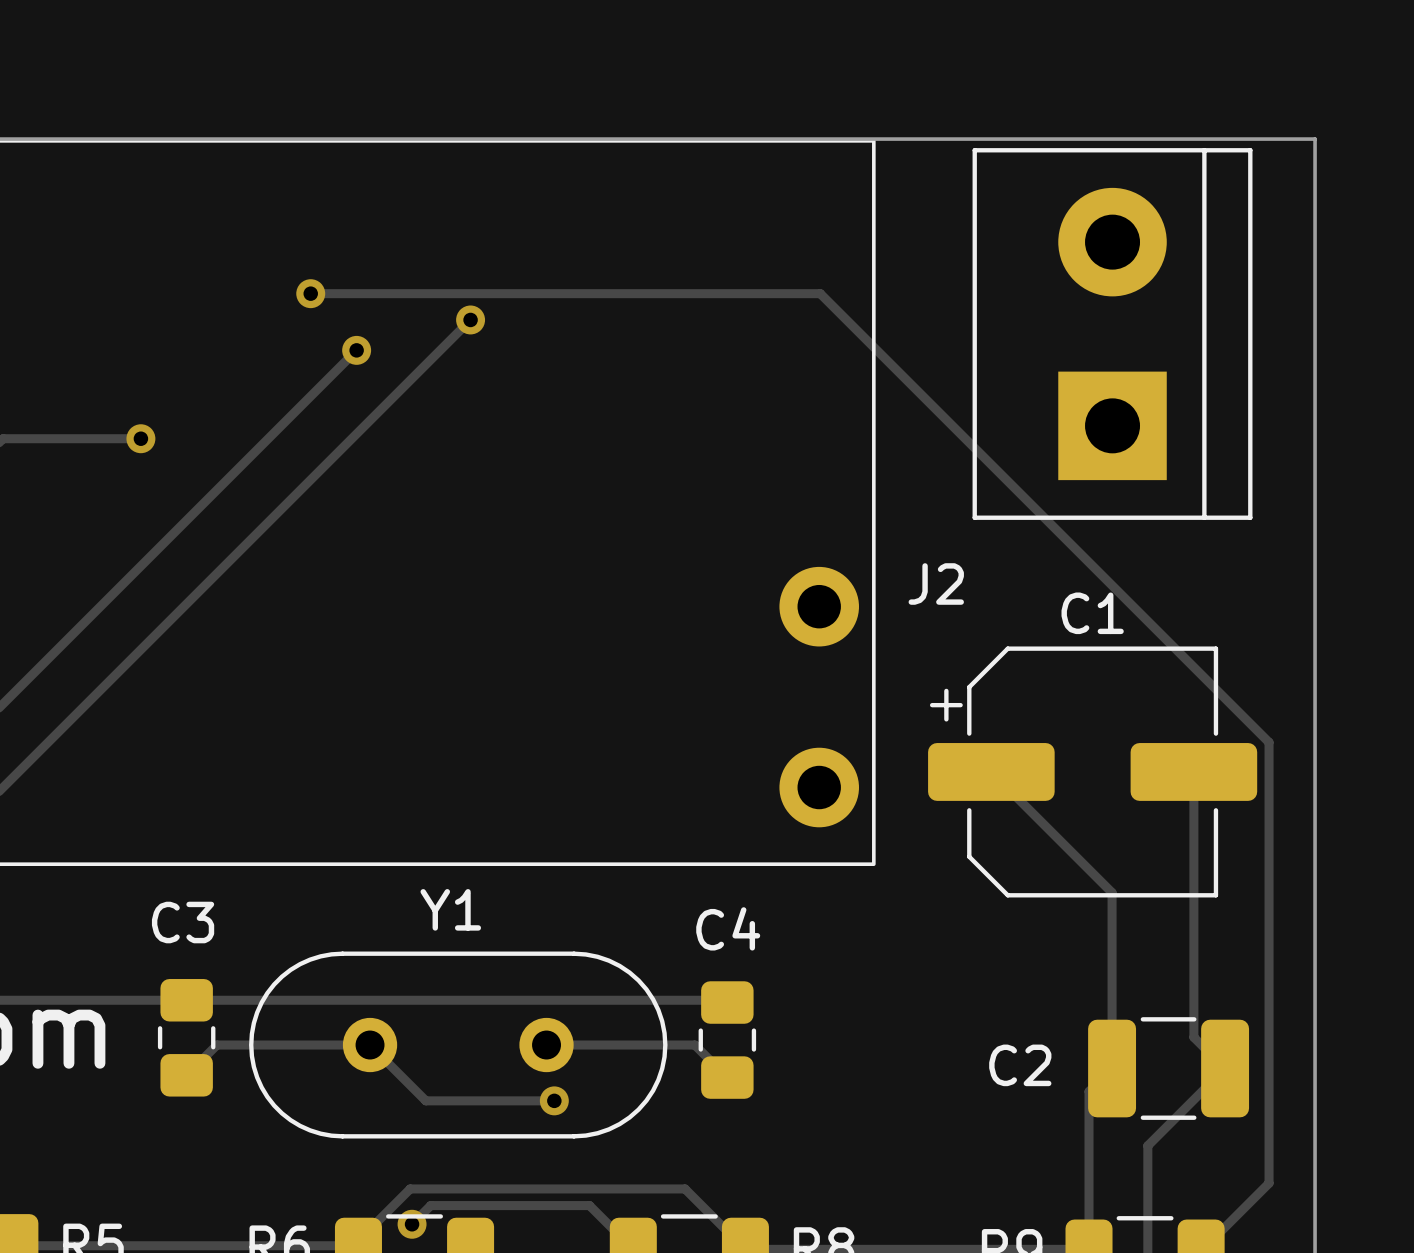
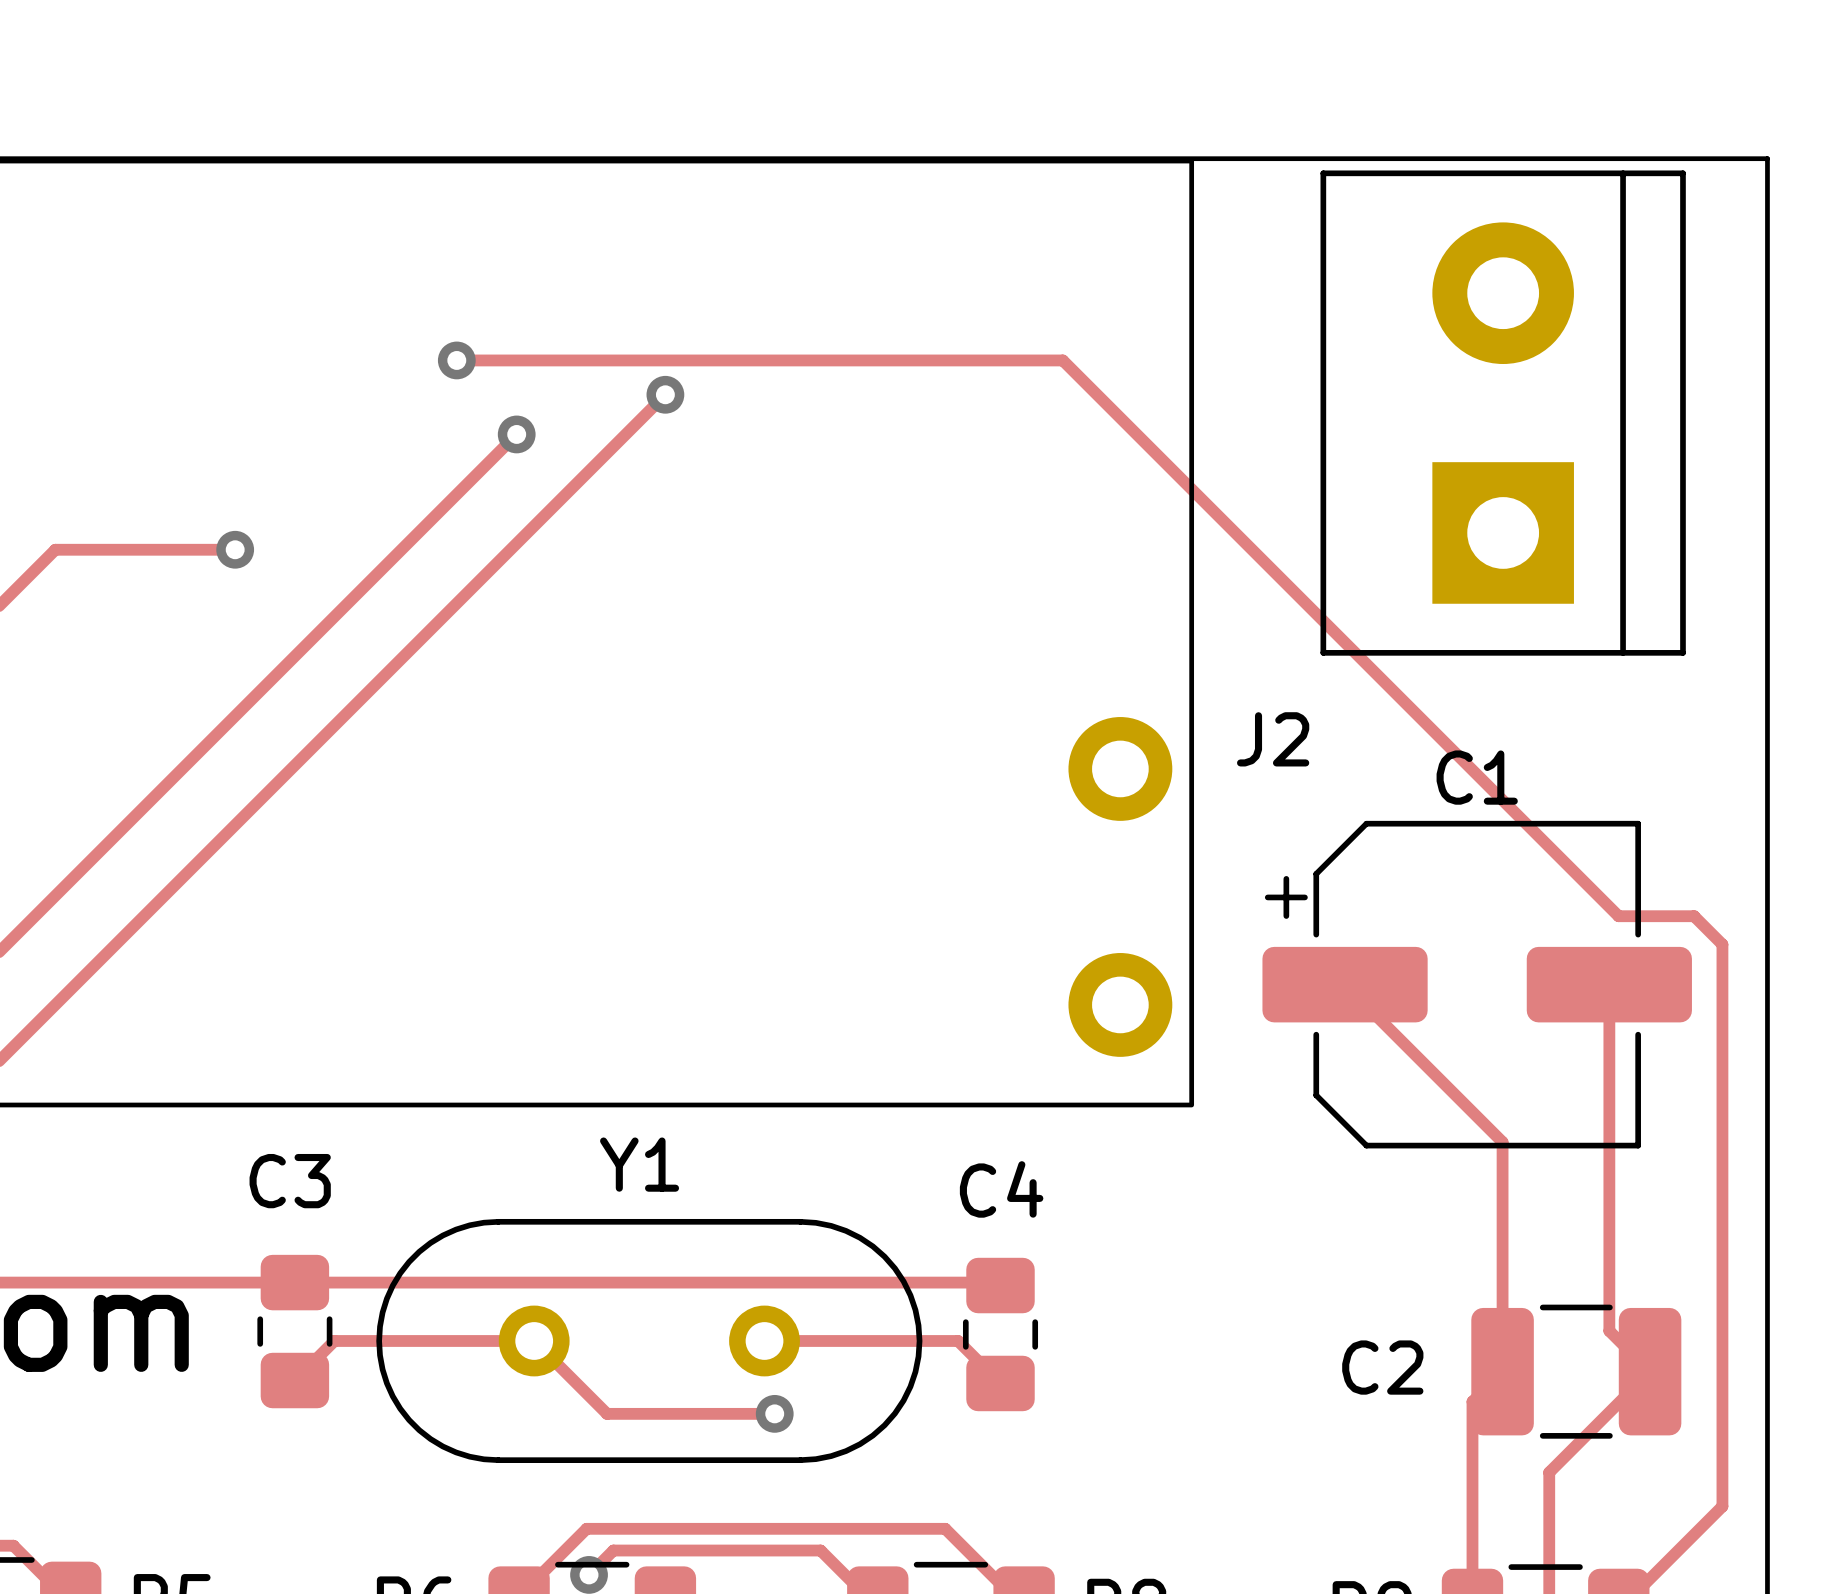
track: (775, 293) (820, 293) (1269, 742) (1269, 1183) -> (1062, 360) (1618, 916) (1694, 916) (1722, 944) (1722, 1506) (1707, 1521)

